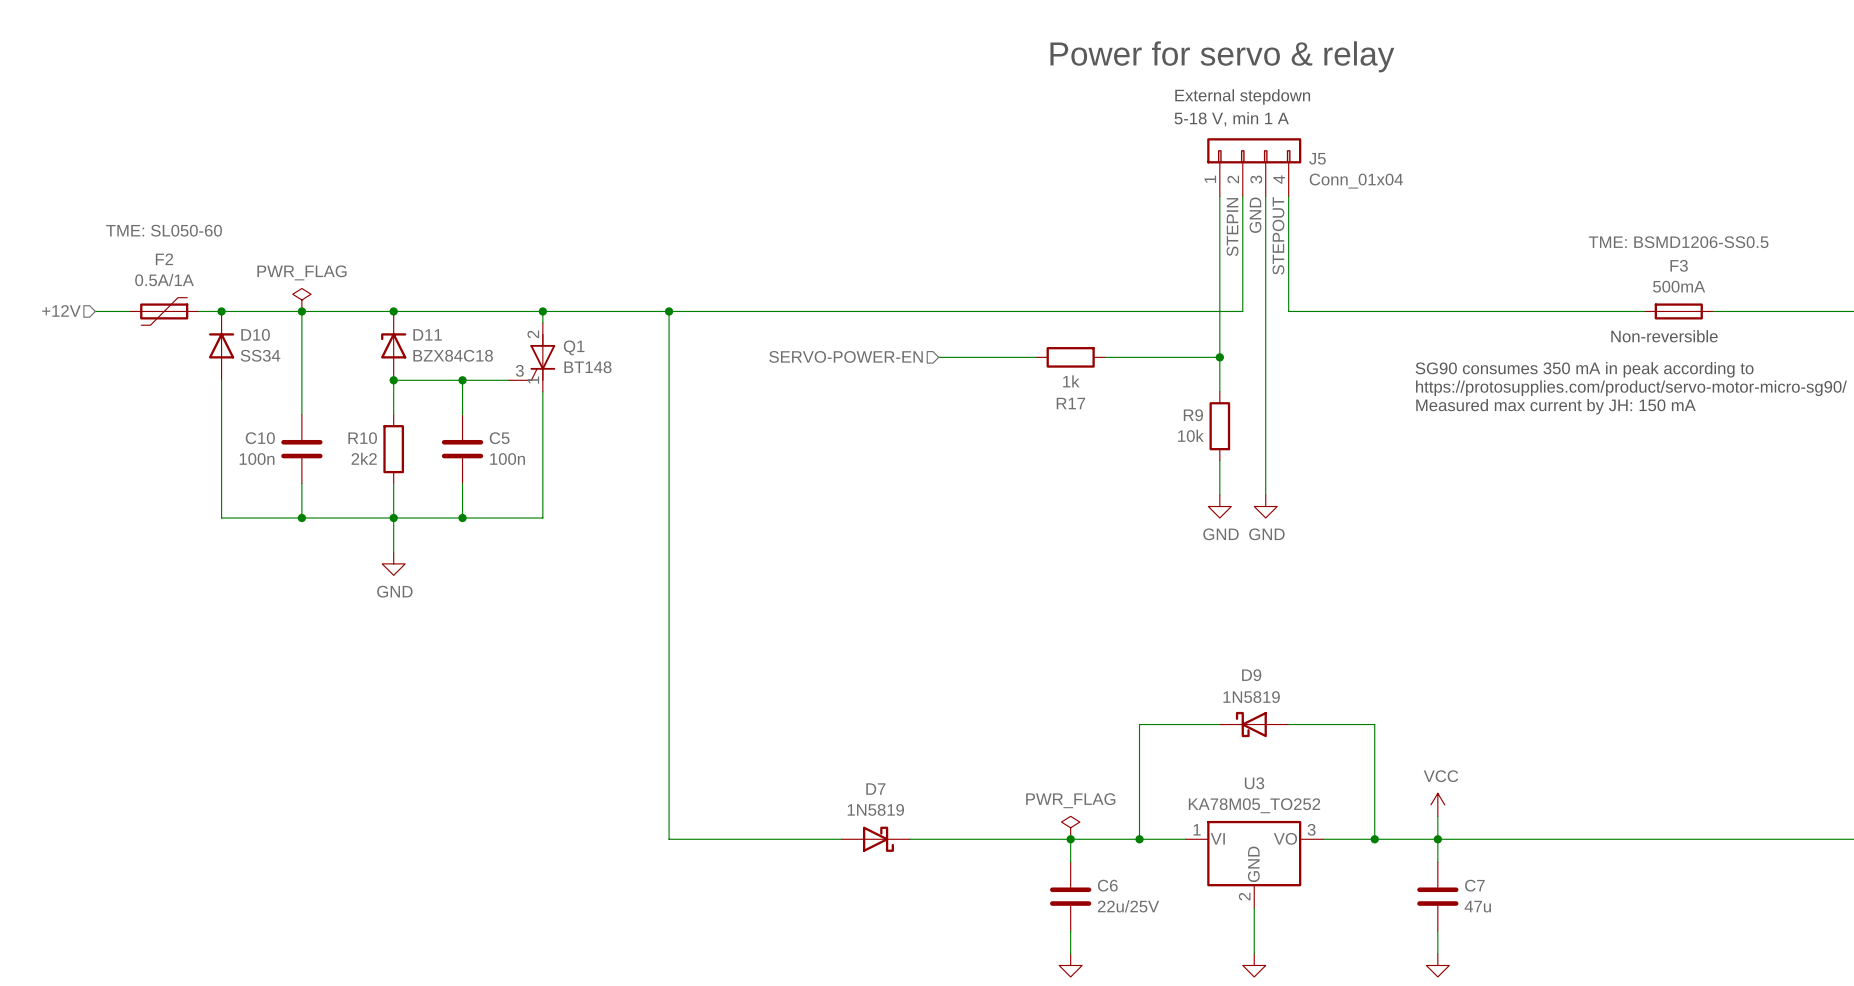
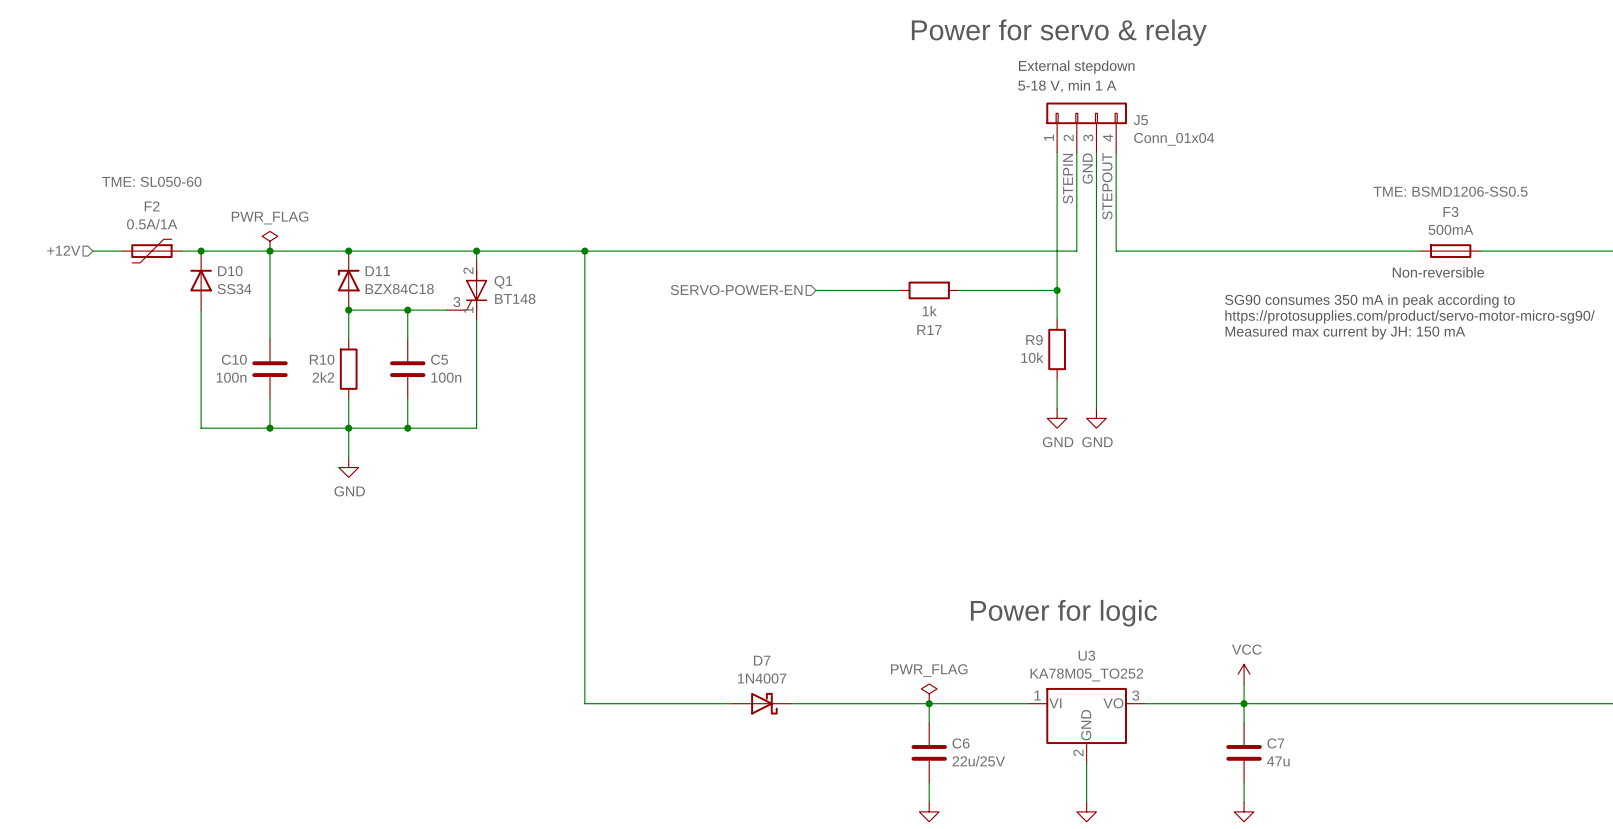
wire: (1219, 724) (1139, 724) (1139, 839) -> none
D9: 1N5819 (1254, 724) -> none
wire: (1288, 724) (1374, 724) (1374, 839) -> none
text: none -> Power for logic (1063, 613)
D7 value: 1N5819 (875, 809) -> 1N4007 (762, 678)
junction: (1139, 839) -> none
junction: (1374, 839) -> none

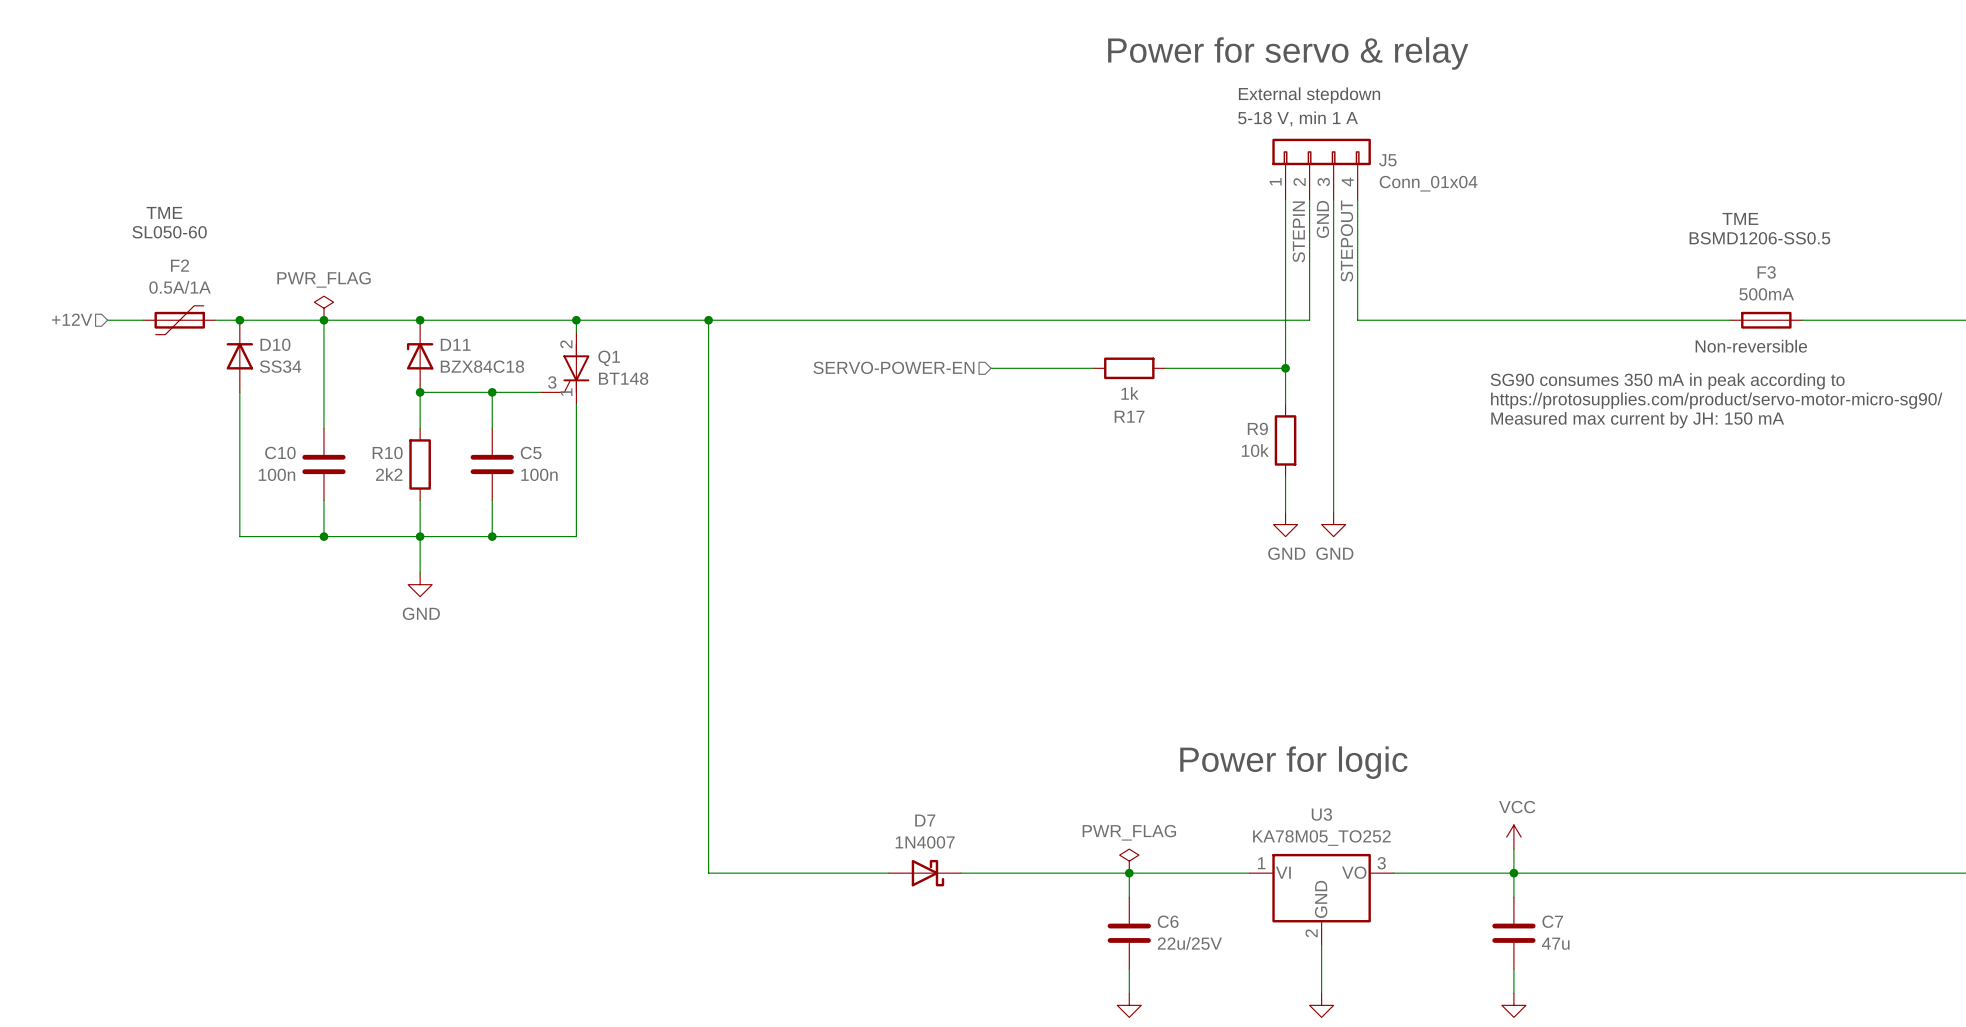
text: none -> TME (164, 212)
text: none -> TME (1740, 218)
text: none -> SL050-60 (169, 232)
F2 text: TME: SL050-60 (151, 181) -> none
text: none -> BSMD1206-SS0.5 (1759, 238)
F3 text: TME: BSMD1206-SS0.5 (1450, 191) -> none

